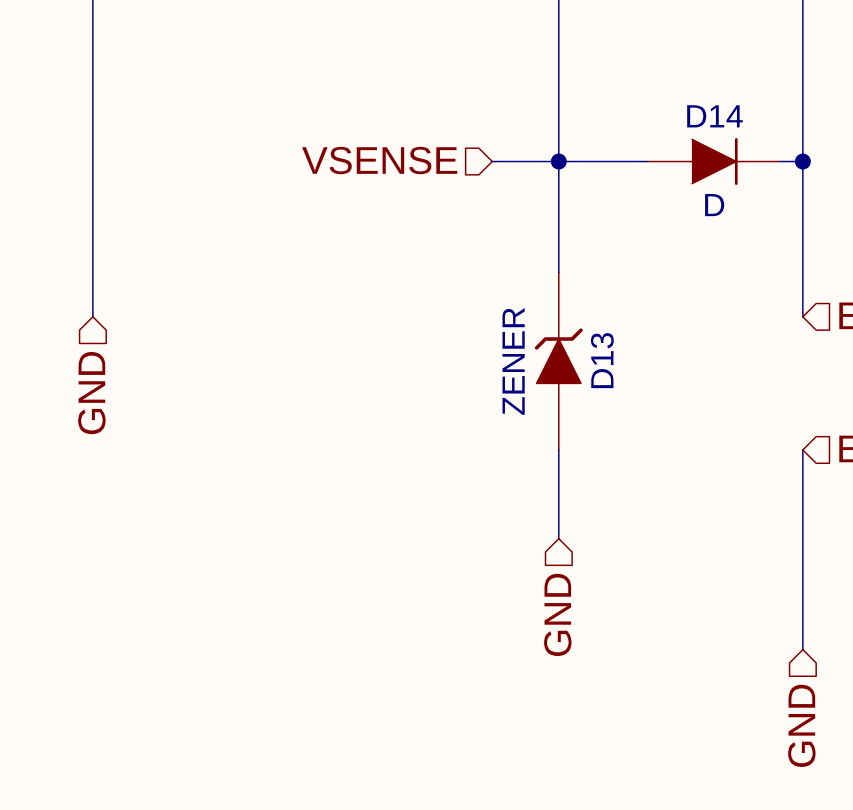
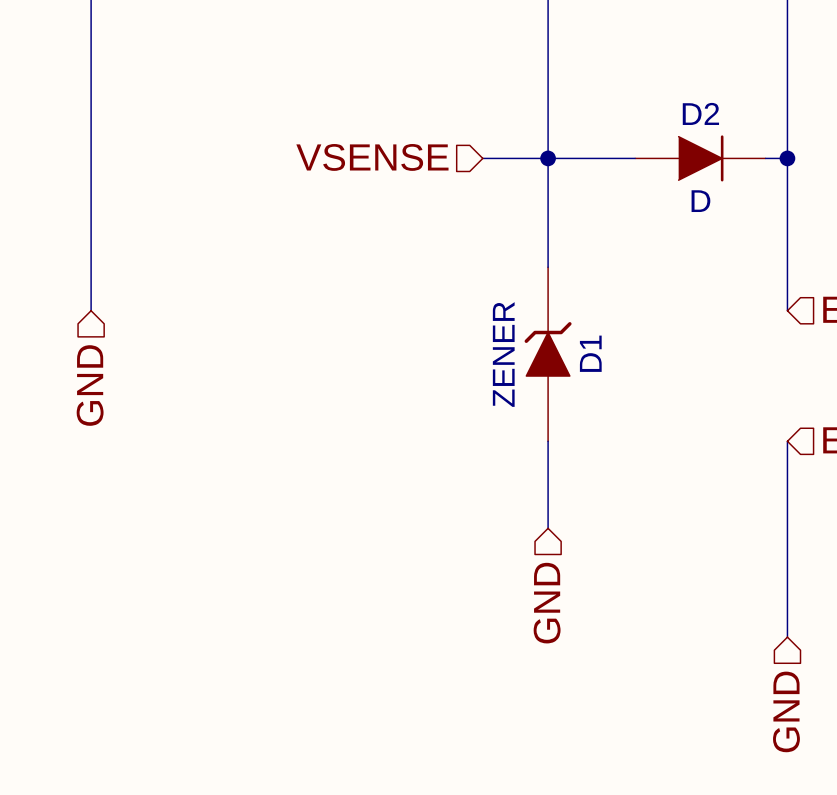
D14 name: D14 (714, 116) -> D2 (700, 113)
D13 name: D13 (602, 360) -> D1 (590, 353)

